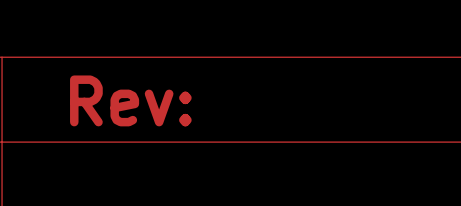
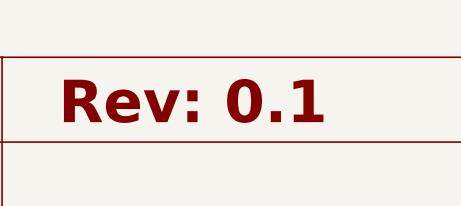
title block: Rev: (130, 100) -> Rev: 0.1 (193, 100)

